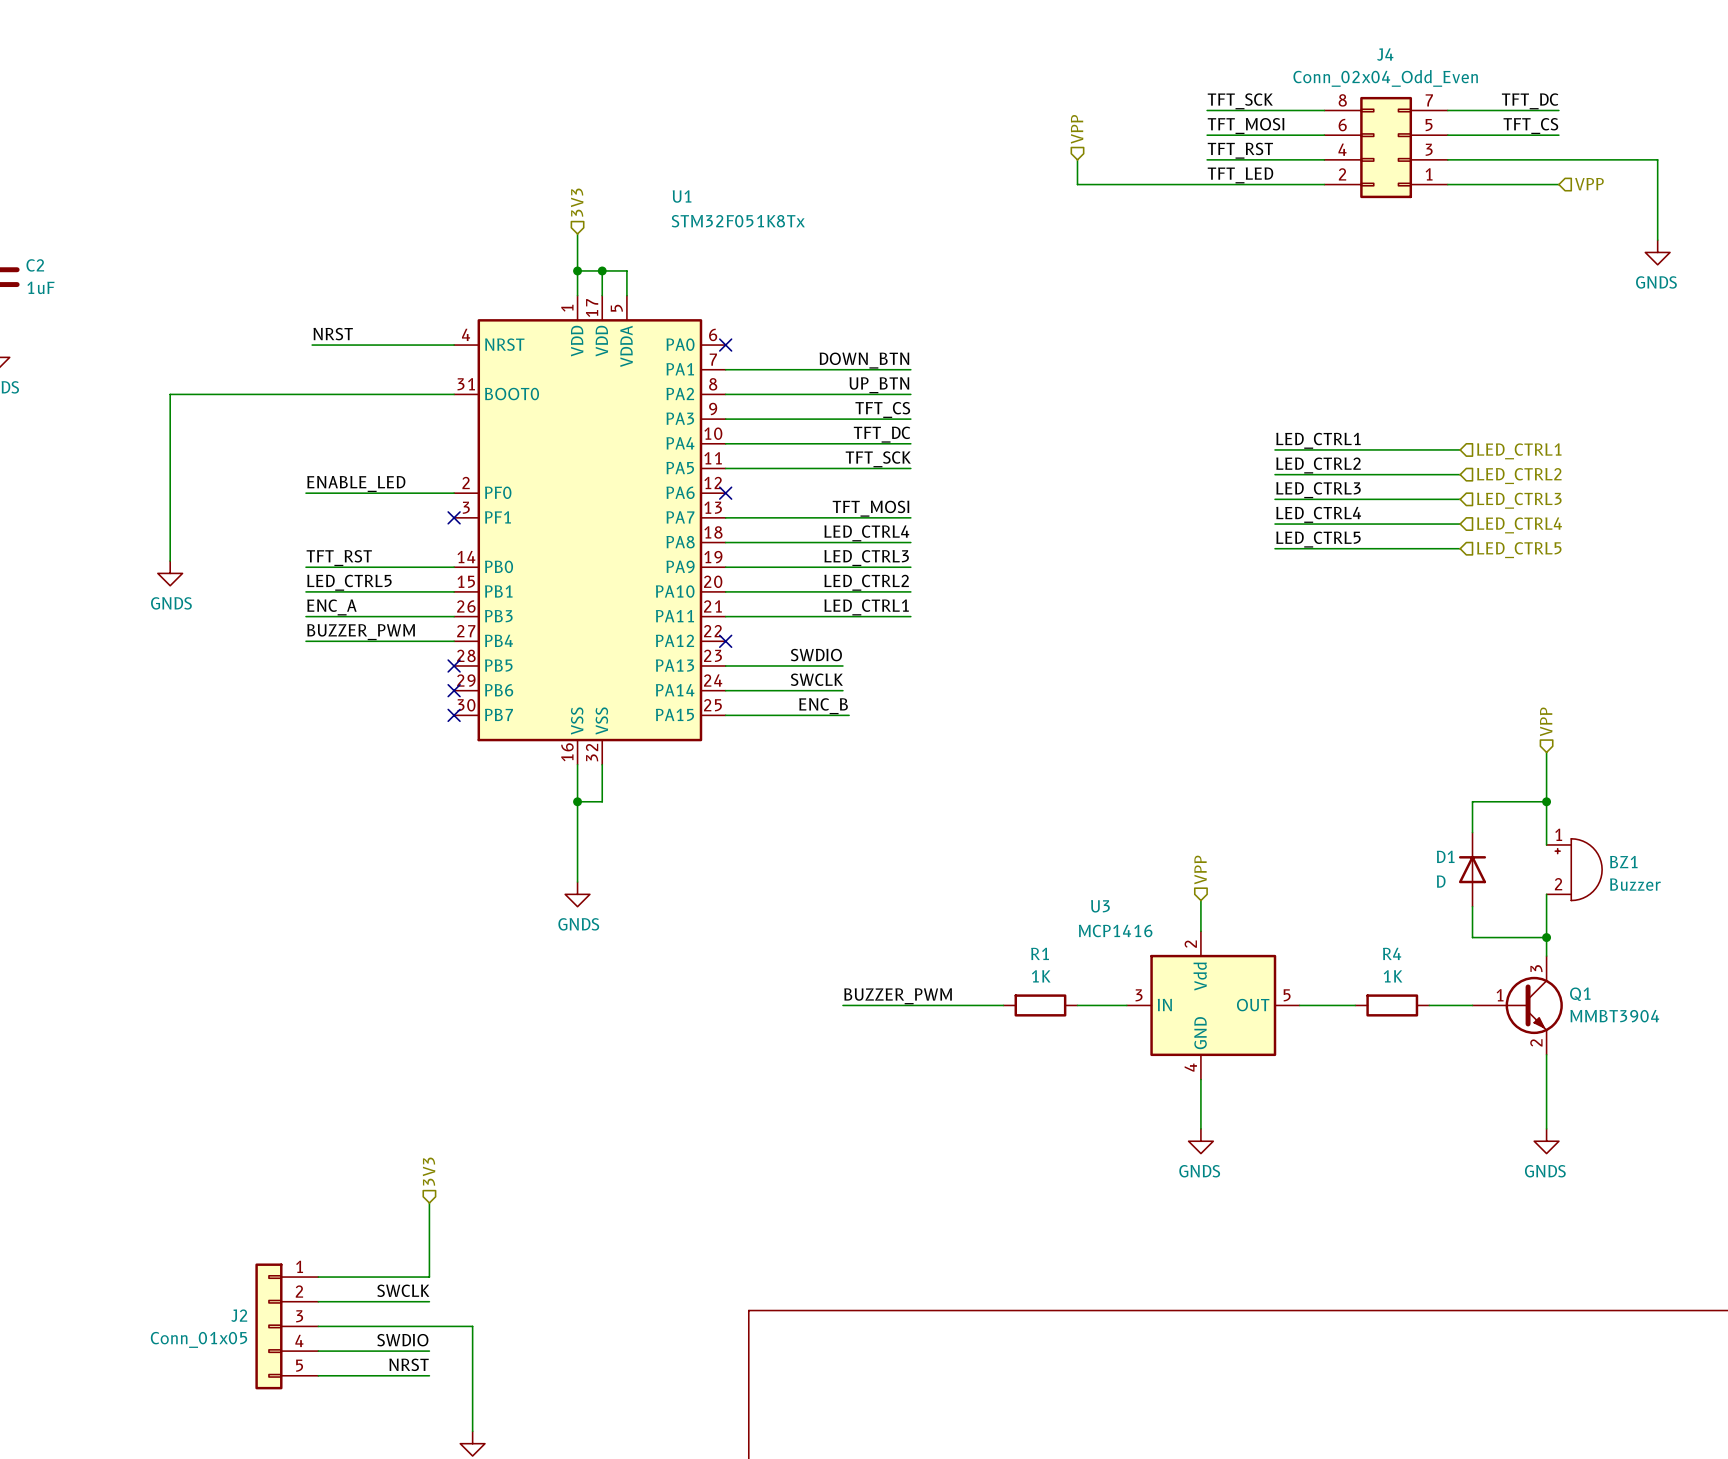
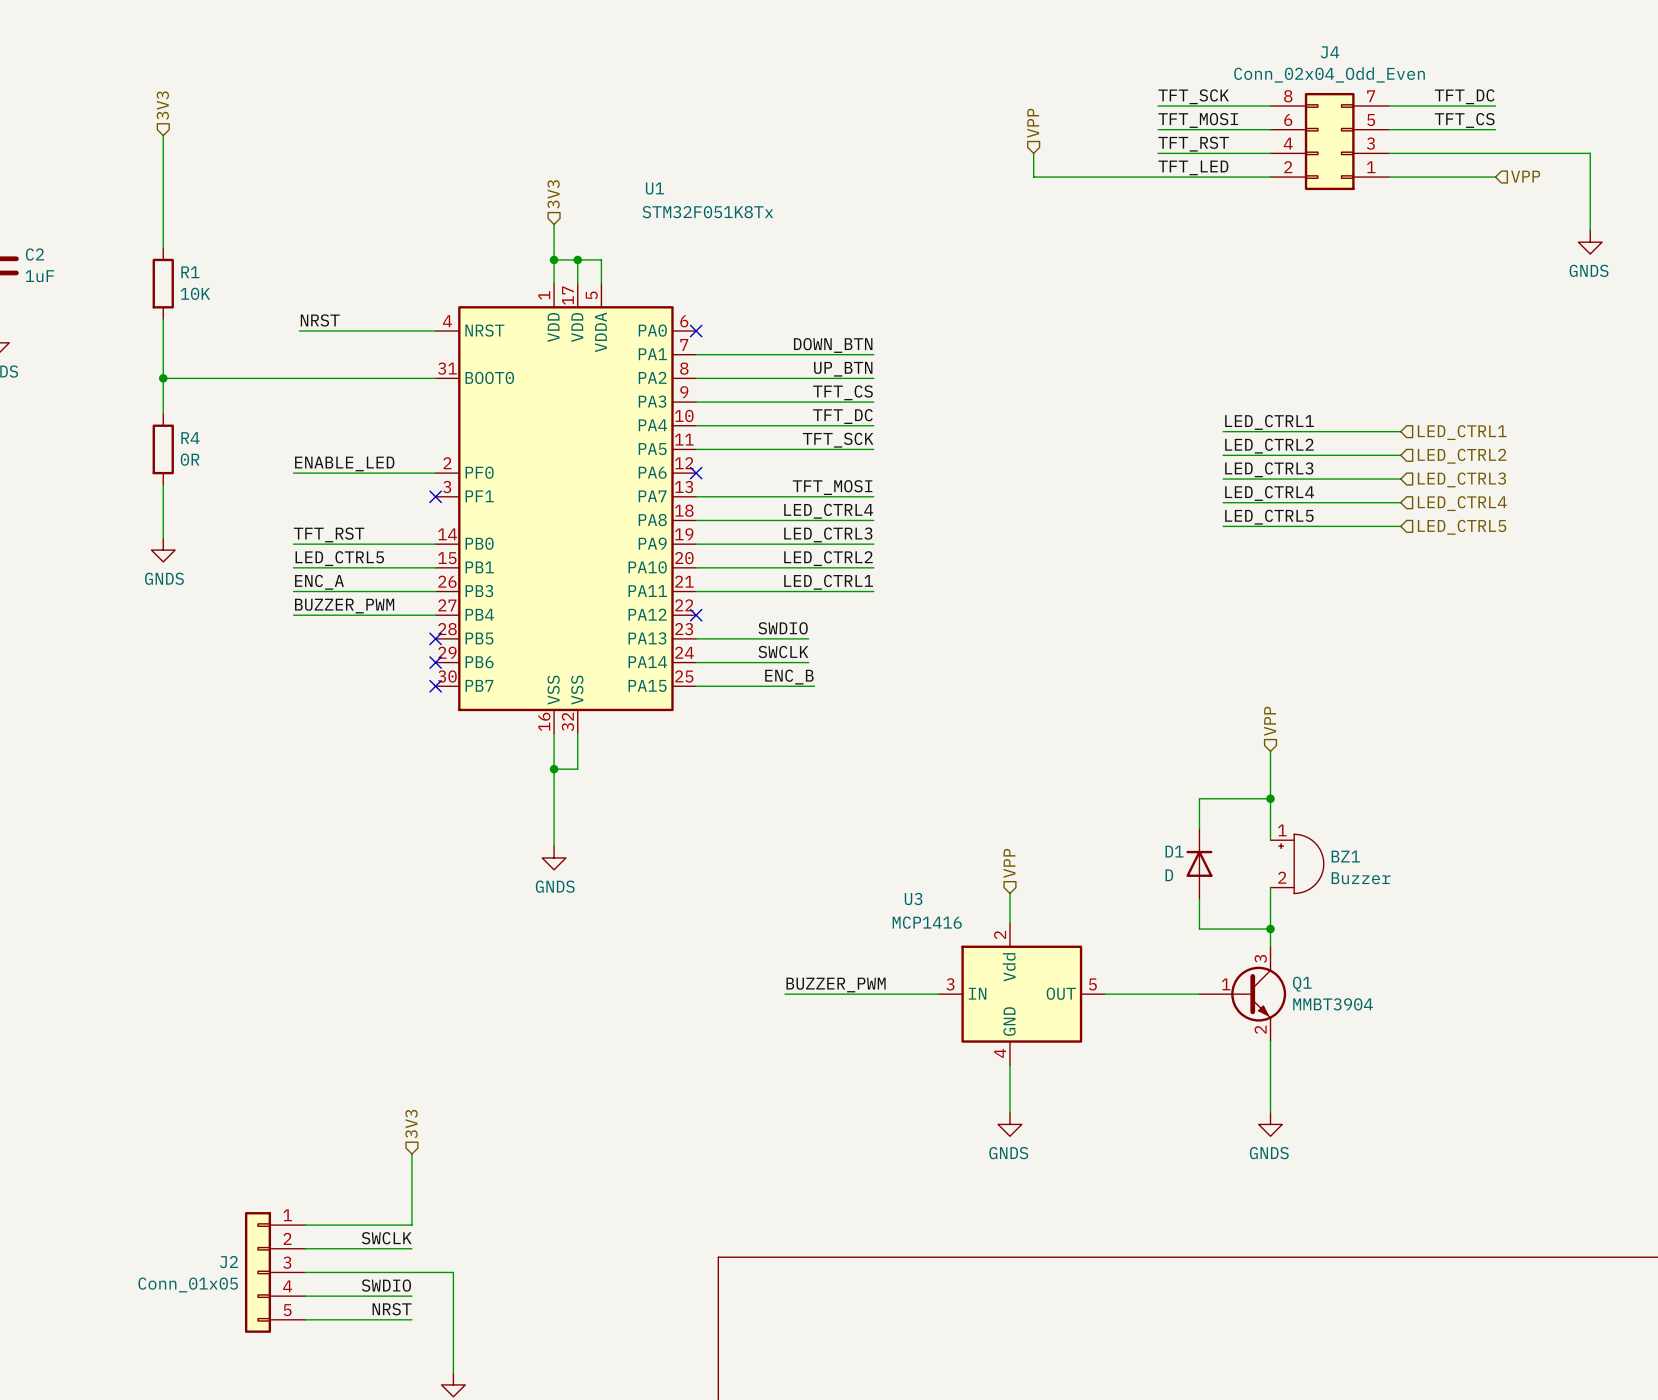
hierarchical label: none -> 3V3 (162, 105)
wire: none -> (163, 135) (163, 248)
wire: none -> (163, 319) (163, 378)
junction: none -> (163, 378)
wire: (170, 431) (170, 505) -> none
hierarchical label: VPP (1546, 721) -> none
hierarchical label: none -> VPP (1270, 721)
wire: (1546, 752) (1546, 844) -> (1270, 751) (1270, 840)
wire: (1546, 801) (1472, 801) (1472, 832) -> (1270, 798) (1199, 798) (1199, 828)
junction: (1546, 801) -> none
junction: none -> (1270, 798)
D1 position: (1472, 869) -> (1199, 863)
BZ1 position: (1574, 869) -> (1297, 863)
hierarchical label: VPP (1200, 870) -> none
wire: (1546, 894) (1546, 956) -> (1270, 887) (1270, 946)
hierarchical label: none -> VPP (1009, 863)
wire: (1200, 900) (1200, 931) -> (1009, 893) (1009, 923)
wire: (1472, 906) (1472, 937) (1546, 937) -> (1199, 899) (1199, 929) (1270, 929)
junction: (1546, 937) -> none
R1 name position: R1 (1040, 953) -> R1 (190, 272)
R4 name position: R4 (1392, 953) -> R4 (190, 438)
junction: none -> (1270, 929)
R1 value: 1K (1041, 976) -> 10K (195, 293)
R4 value: 1K (1393, 976) -> 0R (190, 459)
label position: BUZZER_PWM (898, 996) -> BUZZER_PWM (836, 985)
wire: (842, 1005) (1003, 1005) -> (784, 994) (938, 994)
R1 rotation: 0° (1040, 1005) -> 90° clockwise (163, 283)
R1 position: (1040, 1005) -> (163, 283)
U3 position: (1213, 1005) -> (1021, 994)
wire: (1299, 1005) (1355, 1005) -> none
R4 rotation: 0° (1392, 1005) -> 90° clockwise (163, 449)
R4 position: (1392, 1005) -> (163, 449)
wire: (1429, 1005) (1472, 1005) -> none
Q1 position: (1517, 1005) -> (1242, 994)
wire: (1546, 1054) (1546, 1128) -> (1270, 1041) (1270, 1112)
wire: (1200, 1079) (1200, 1128) -> (1009, 1065) (1009, 1112)
power symbol: GNDS (1200, 1141) -> none
power symbol: GNDS (1546, 1141) -> none
power symbol: none -> GNDS (1009, 1124)
power symbol: none -> GNDS (1270, 1124)

